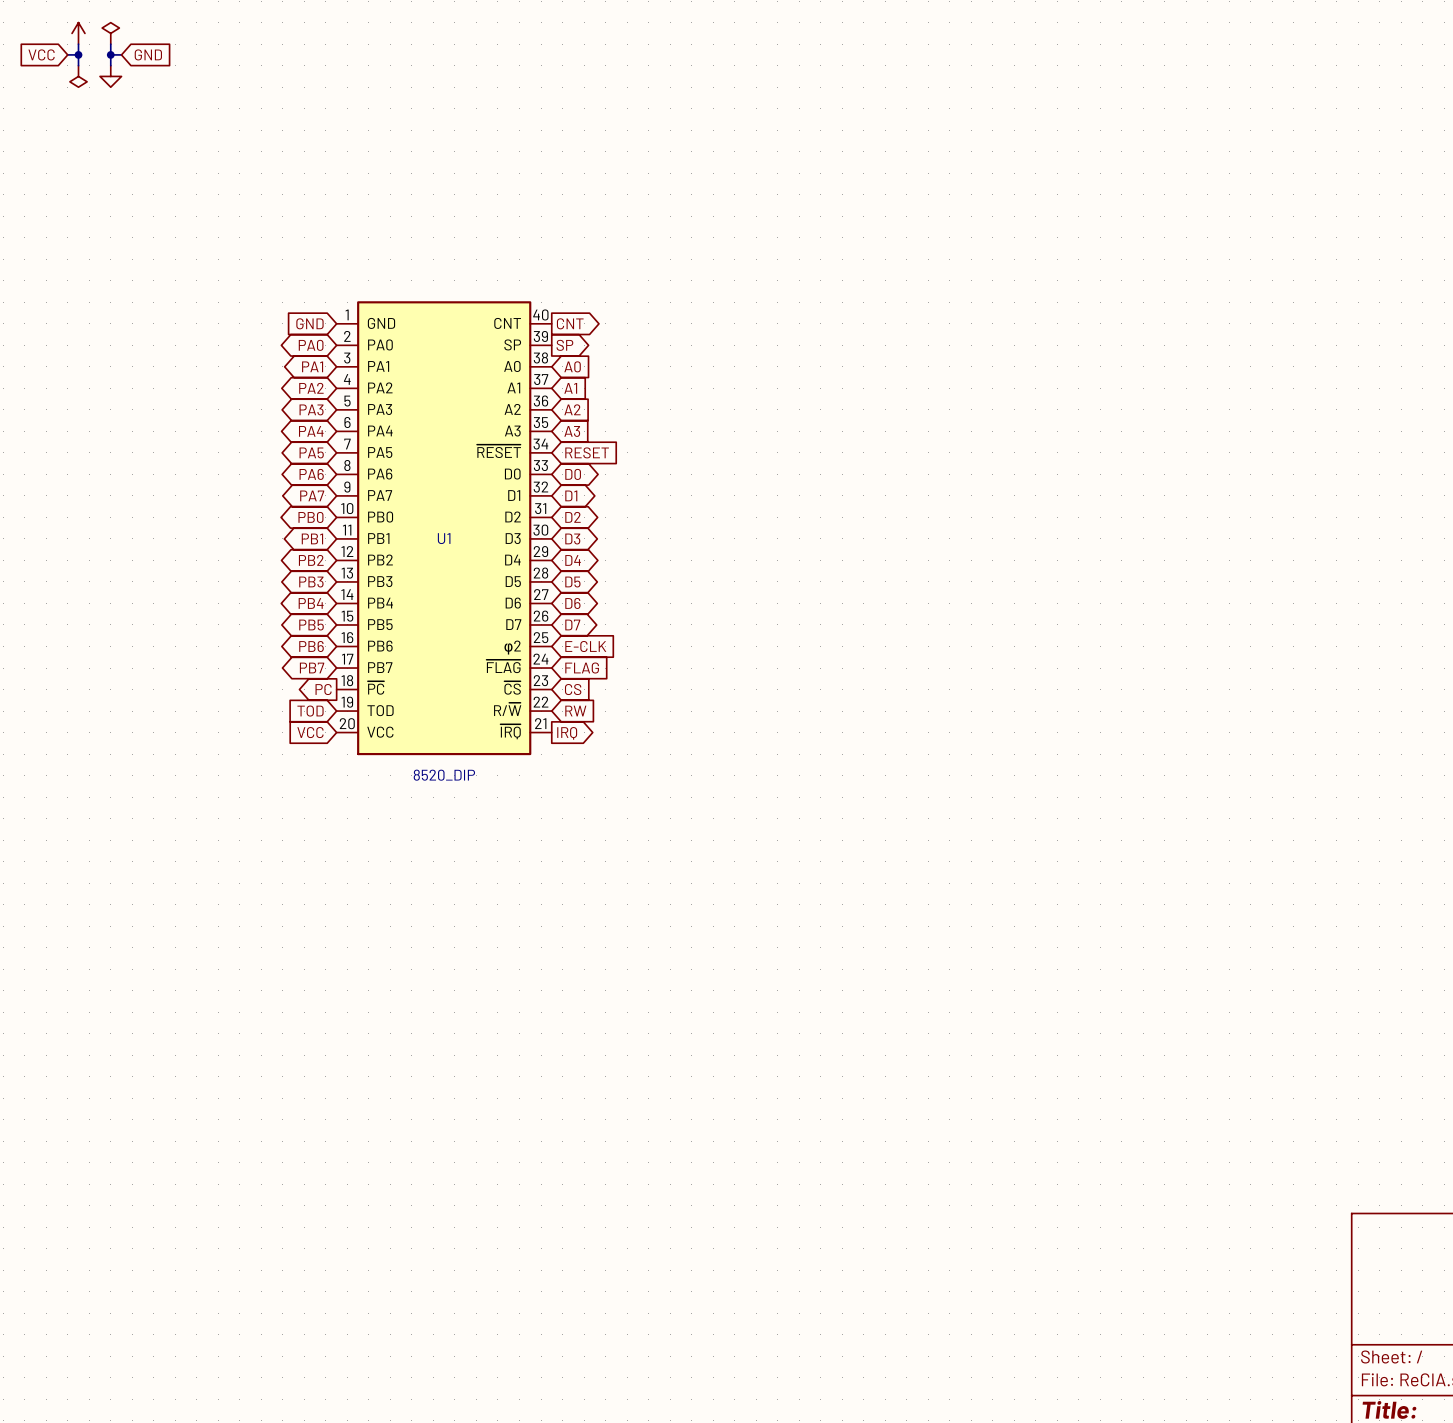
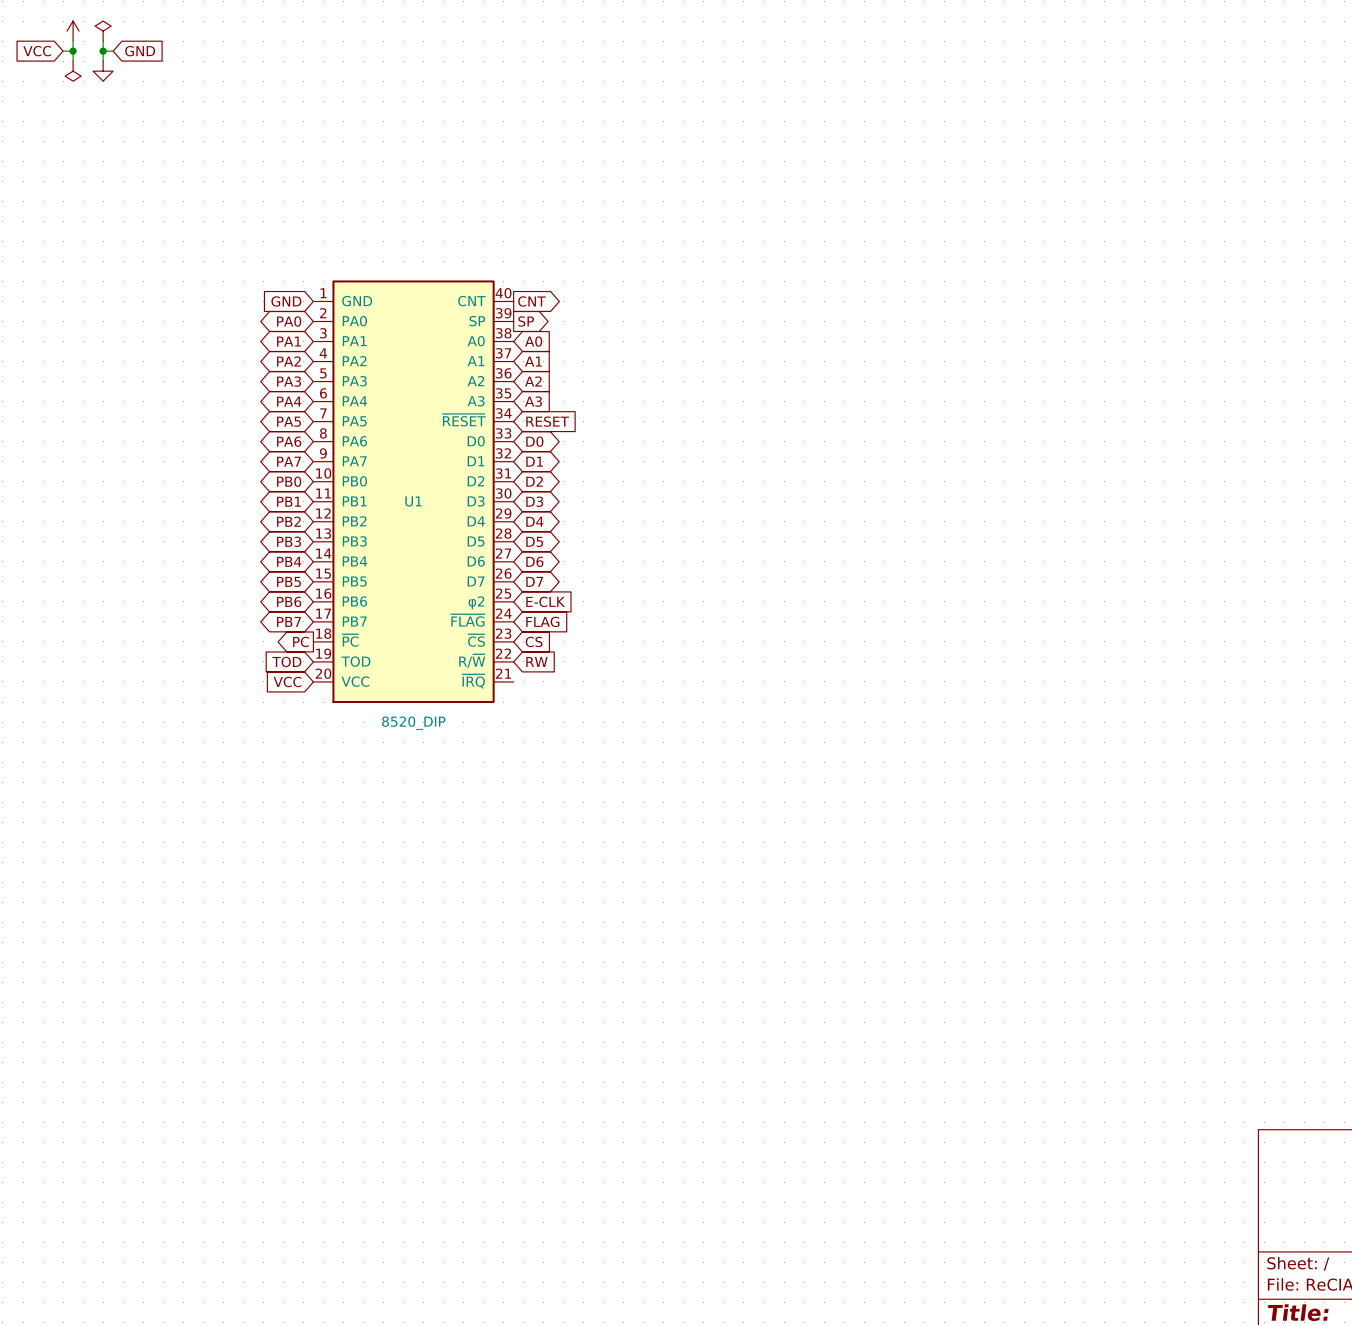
global label: IRQ (567, 733) -> none

